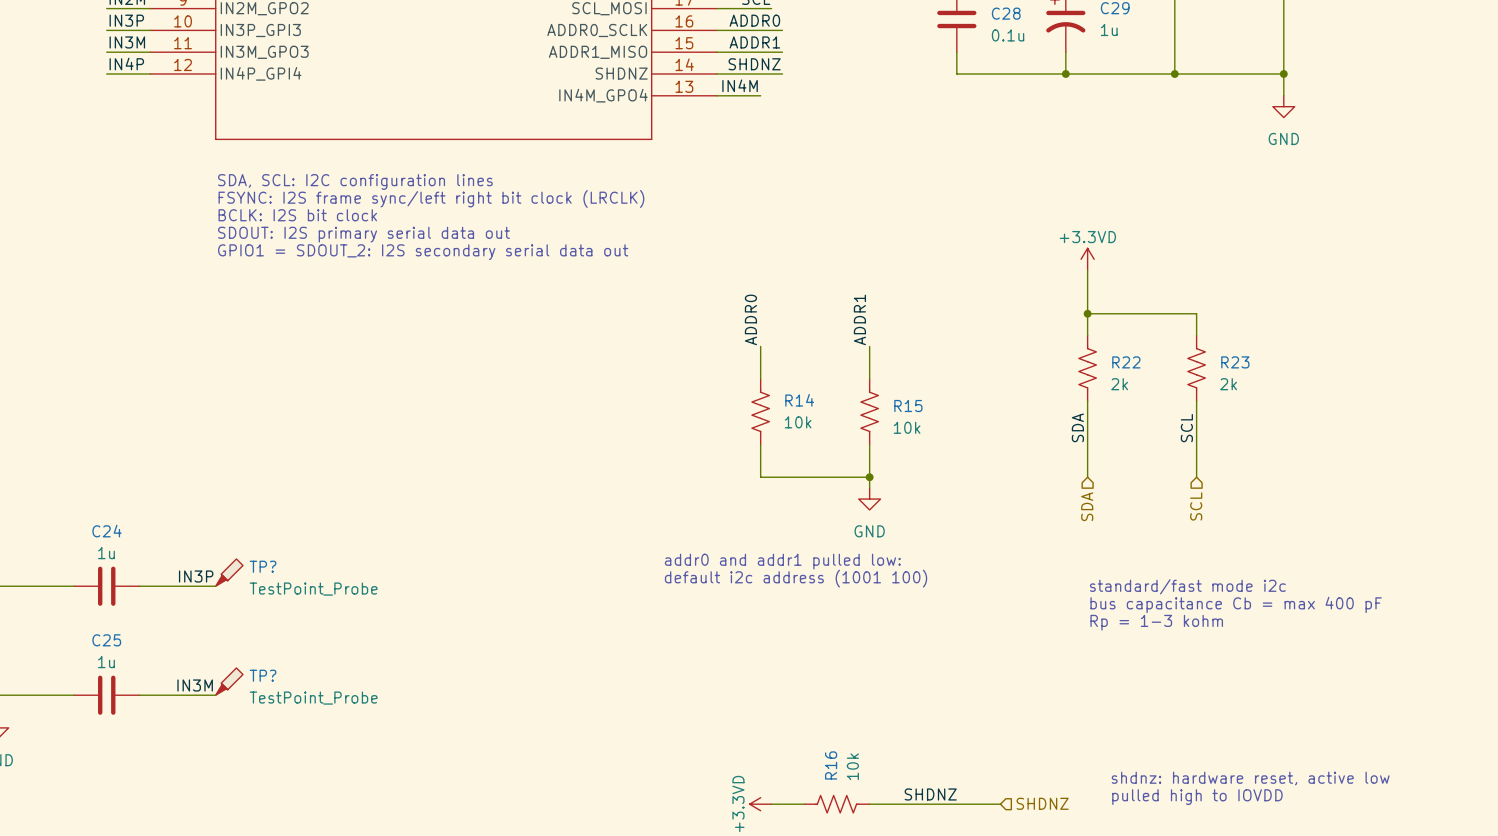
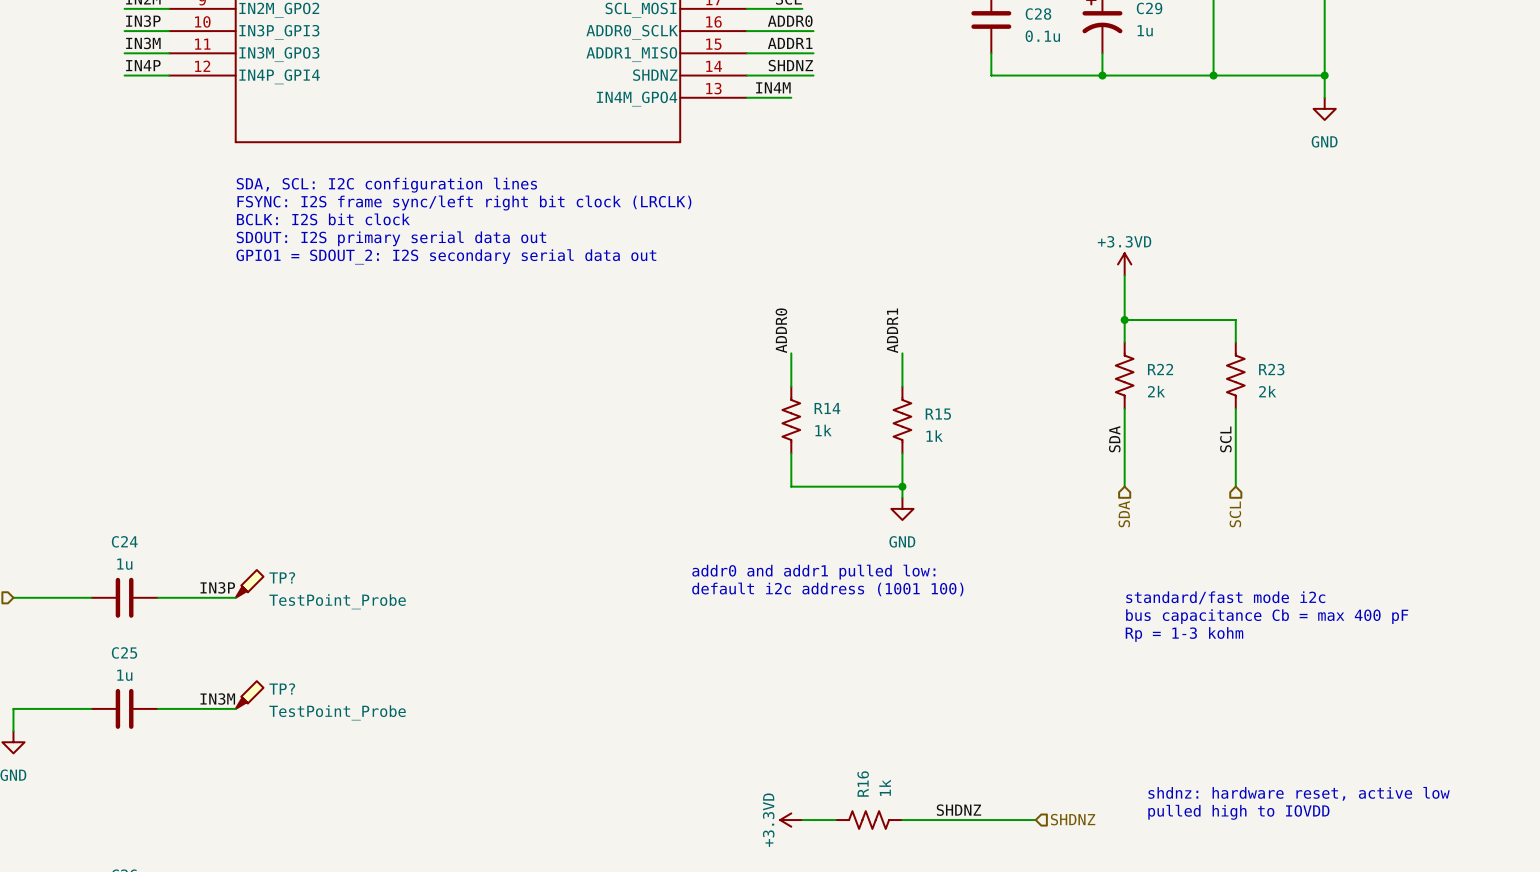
R14 value: 10k (798, 422) -> 1k (823, 430)
R15 value: 10k (907, 427) -> 1k (934, 436)
R16 value: 10k (852, 766) -> 1k (885, 787)

